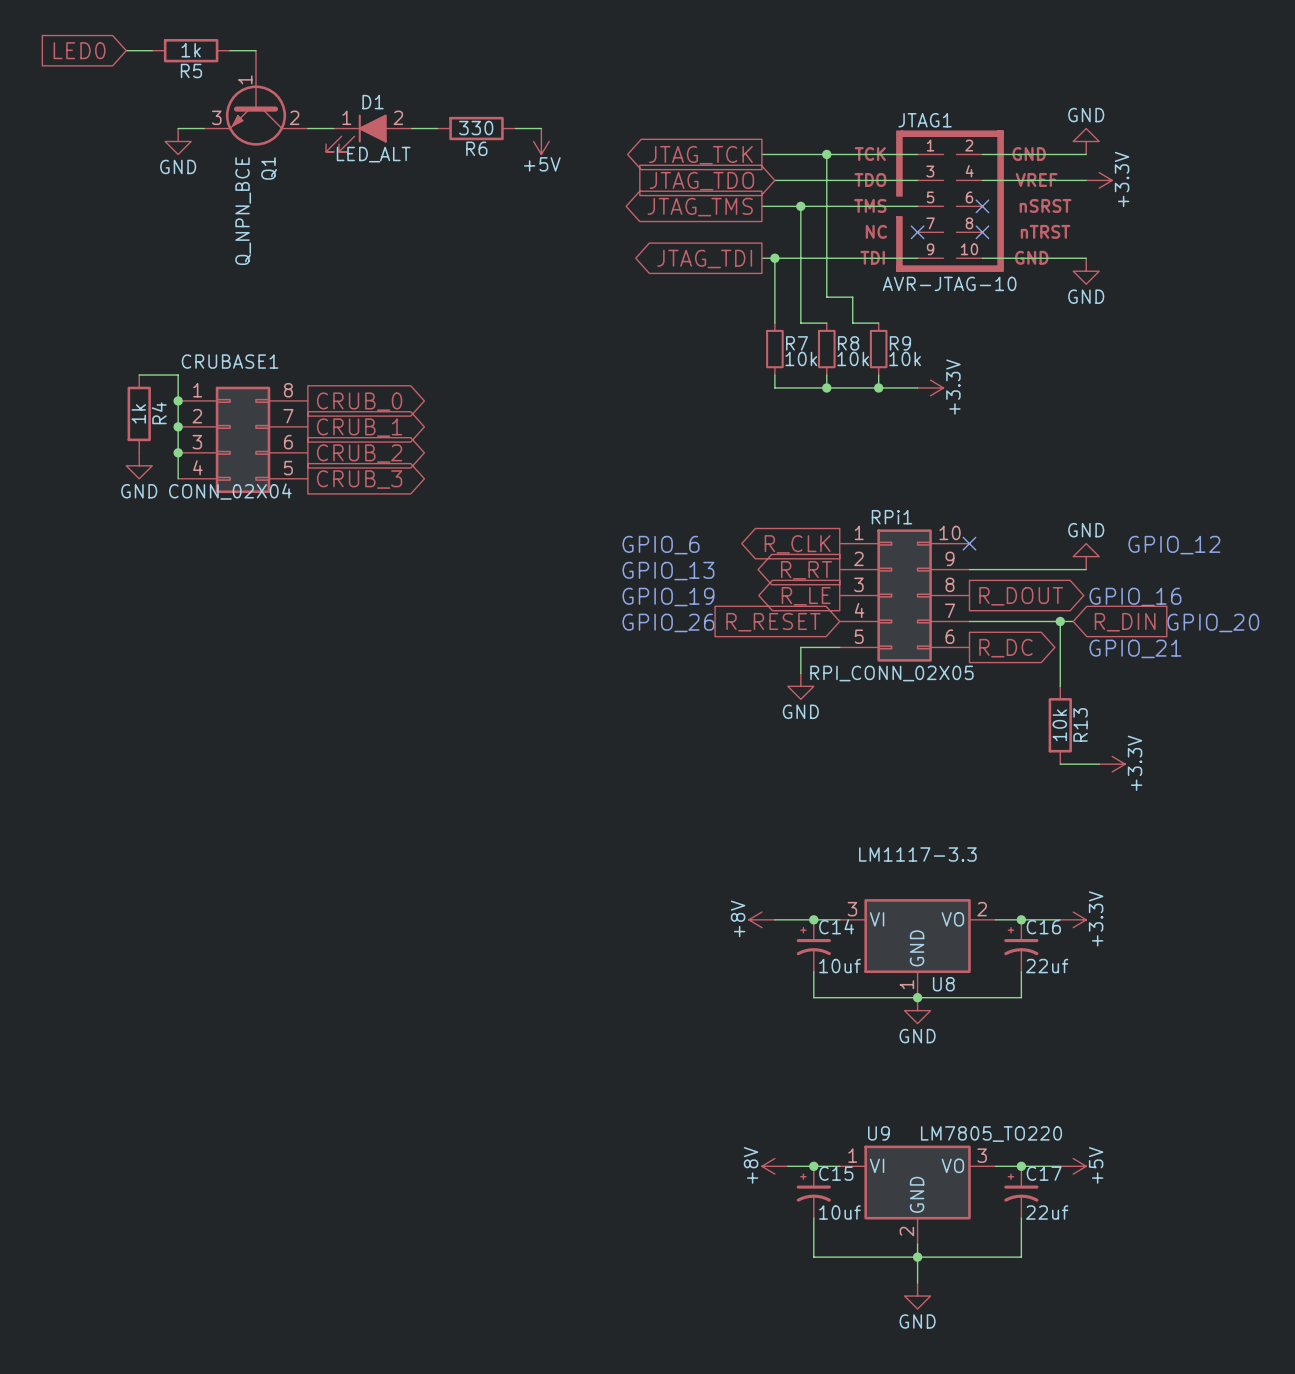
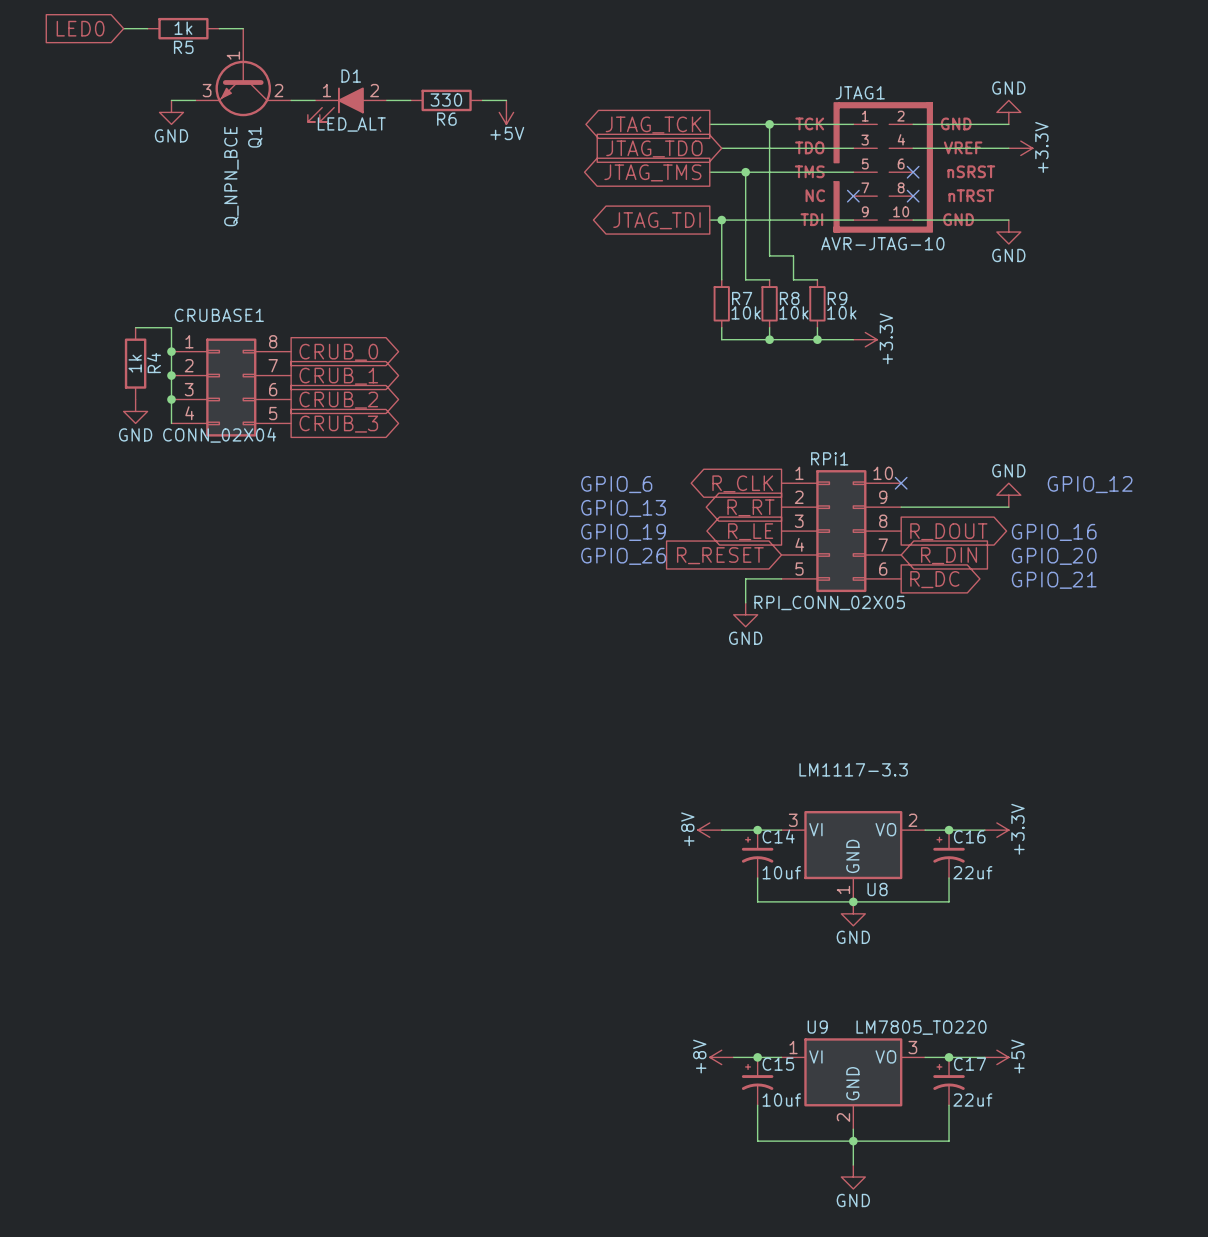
wire: (969, 621) (1073, 621) -> none
wire: (1060, 621) (1060, 686) -> none
junction: (1060, 621) -> none
global label position: R_DIN (1125, 622) -> R_DIN (949, 555)
text position: GPIO_20 (1213, 622) -> GPIO_20 (1054, 556)
R13: 10k (1060, 725) -> none
wire: (1060, 764) (1099, 764) -> none
power symbol: +3.3V (1112, 764) -> none

